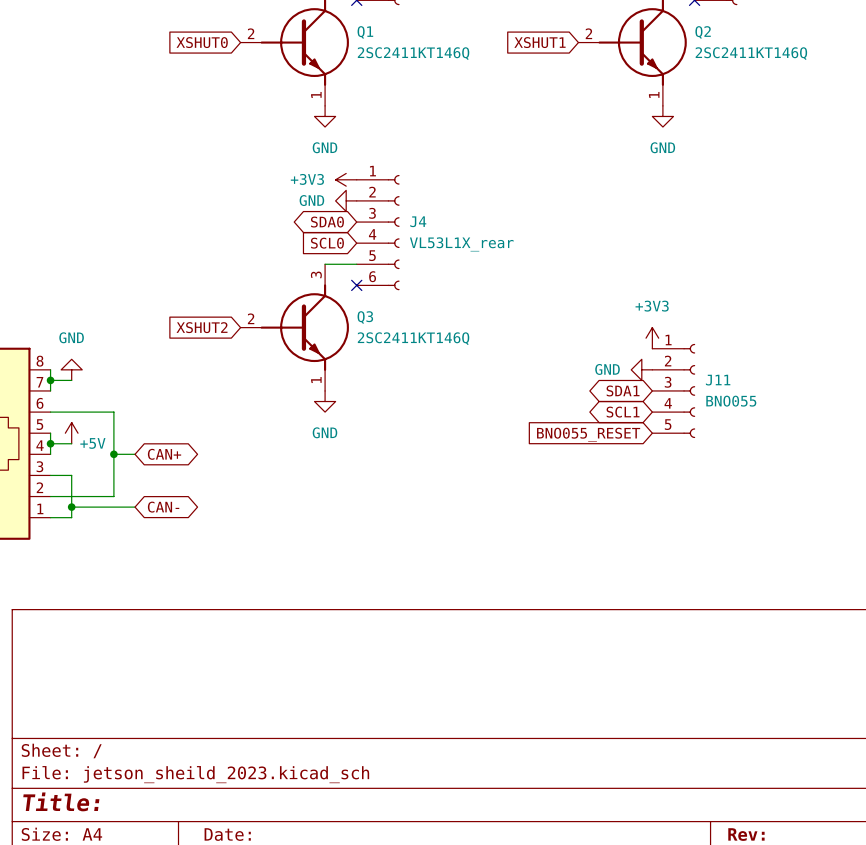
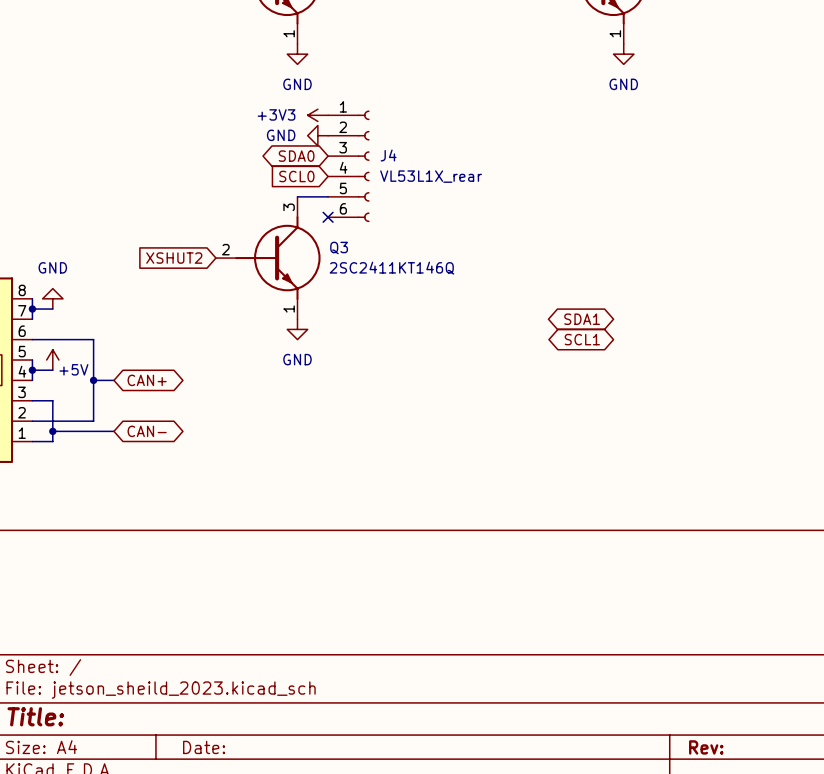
power symbol: +3V3 (652, 338) -> none
power symbol: GND (641, 369) -> none
J11: BNO055 (673, 390) -> none
global label: BNO055_RESET (588, 434) -> none

